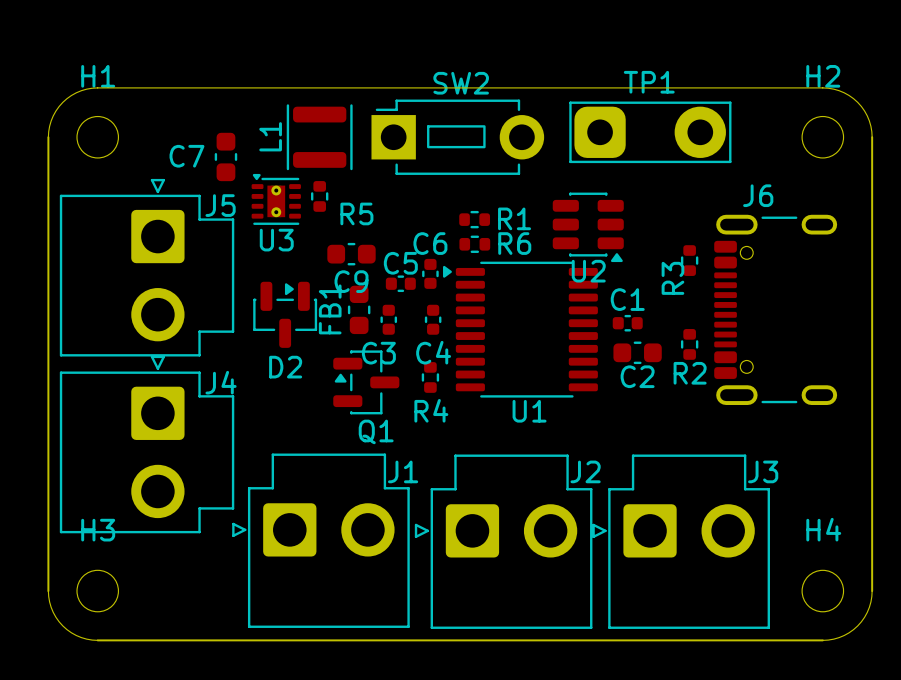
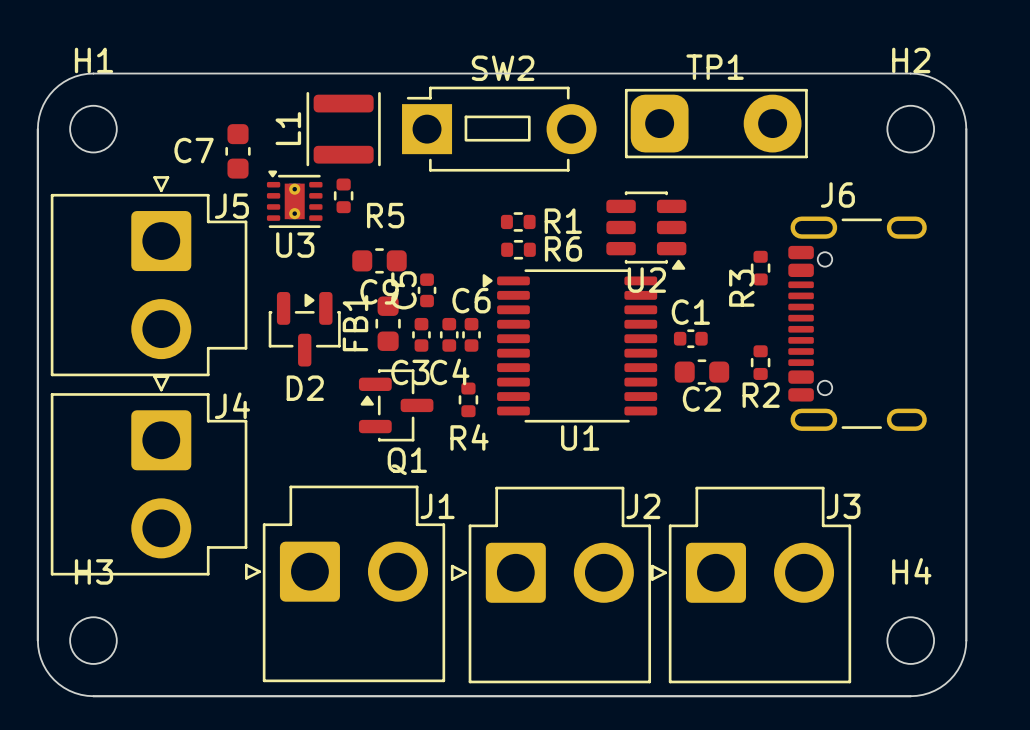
C6: (430, 273) -> none
C5 rotation: 0° (400, 283) -> 90° clockwise (427, 290)
C4: none -> (449, 334)
C4 name: C4 (433, 352) -> C6 (471, 300)

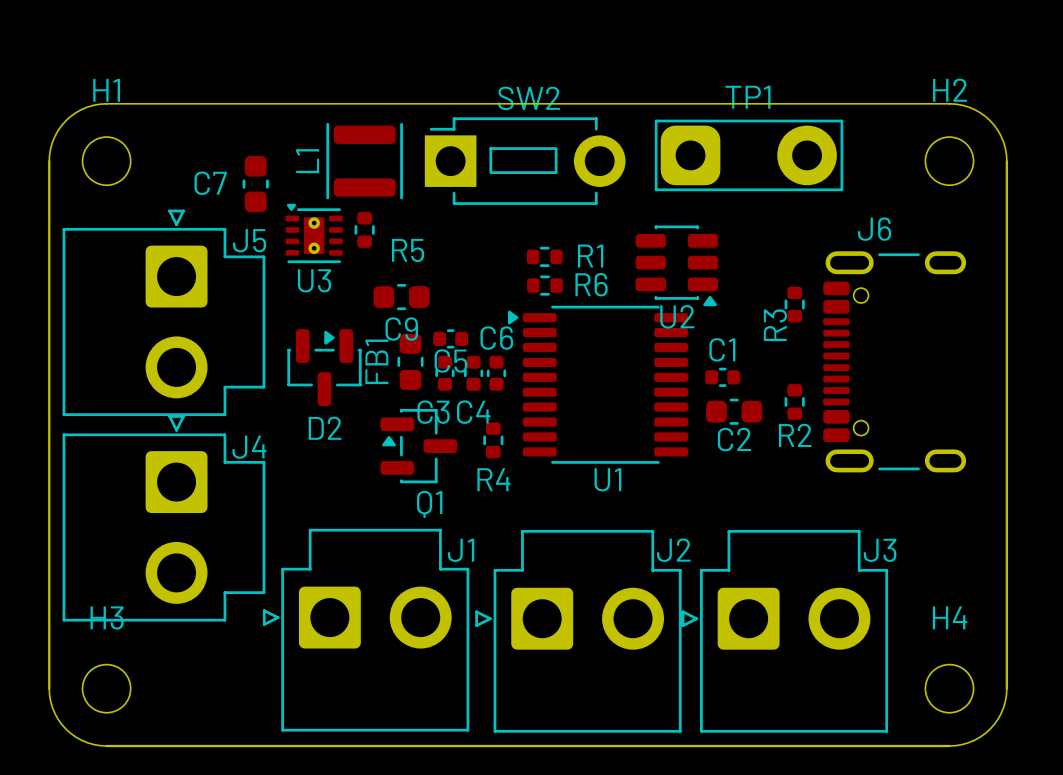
C5 rotation: 0° (427, 290) -> 90° clockwise (450, 338)

